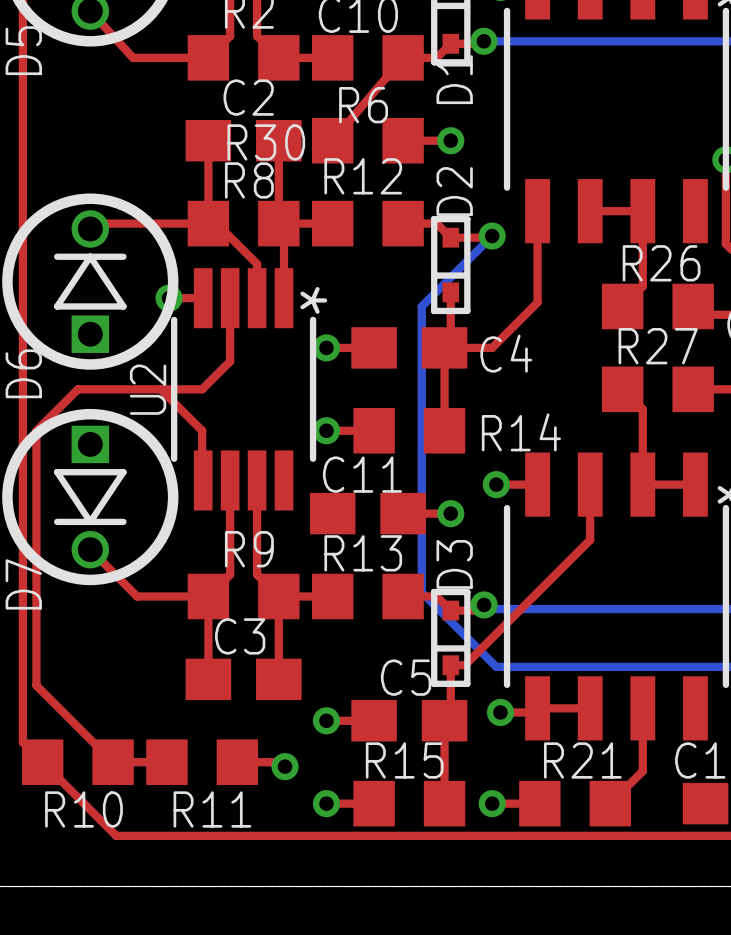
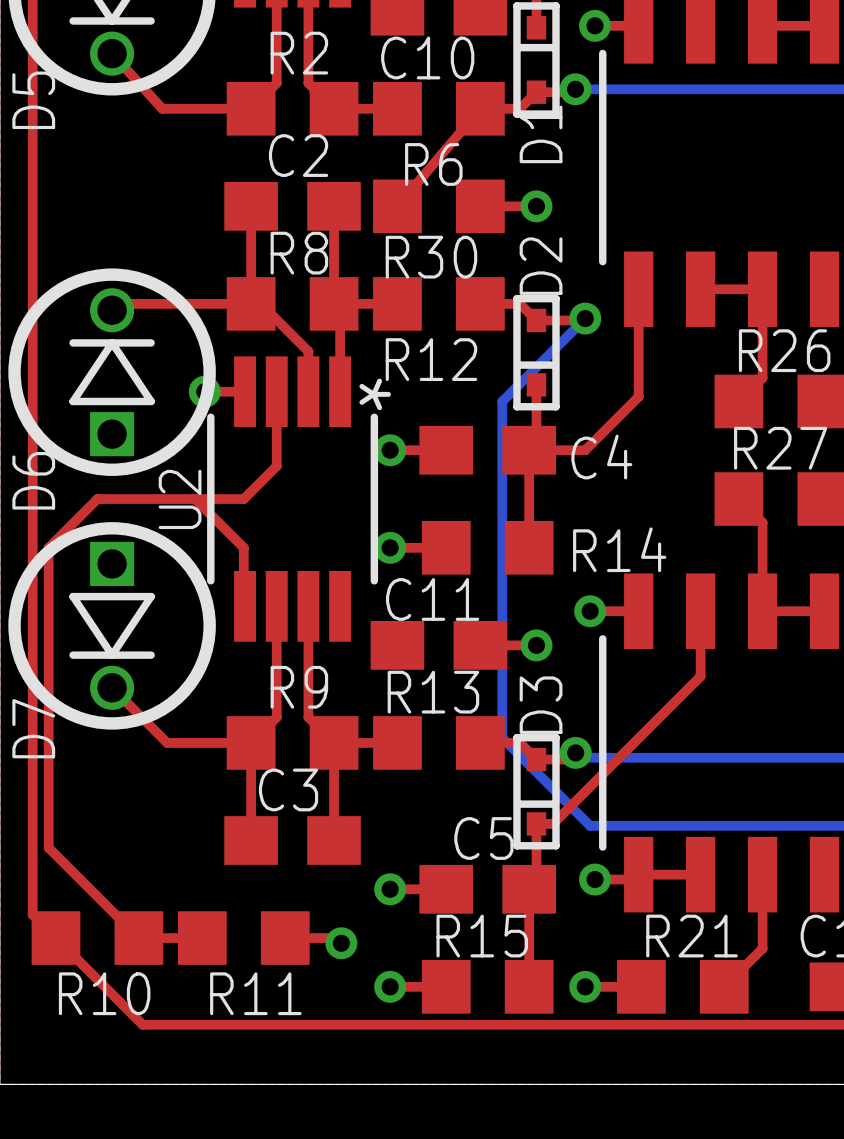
R30 name position: R30 (266, 142) -> R30 (431, 257)
R12 name position: R12 (363, 176) -> R12 (431, 359)

